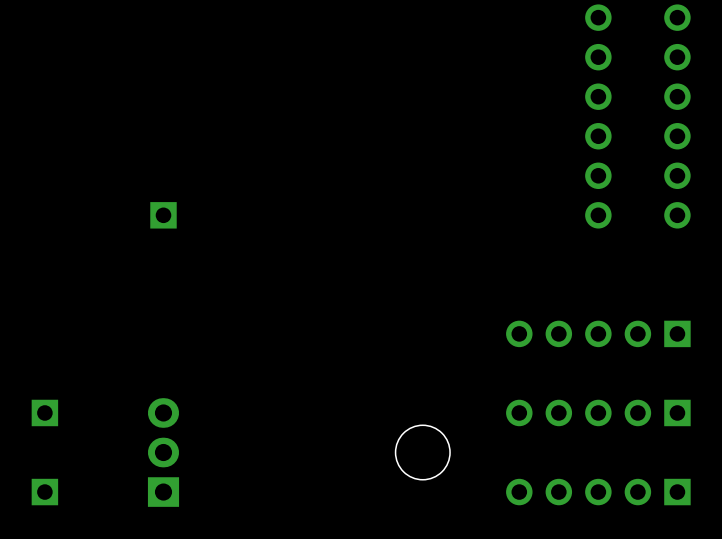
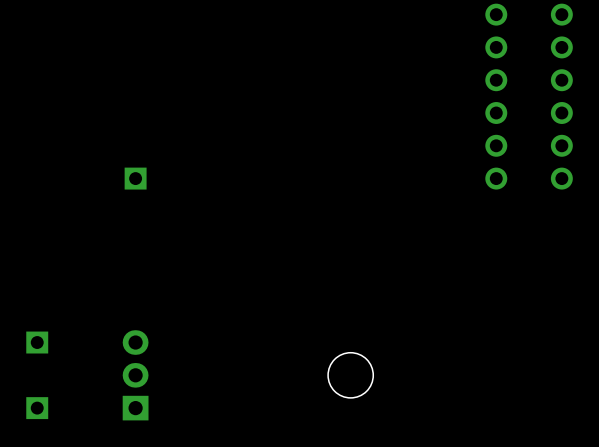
part: (598, 333) -> none
part: (598, 412) -> none
part: (598, 492) -> none

